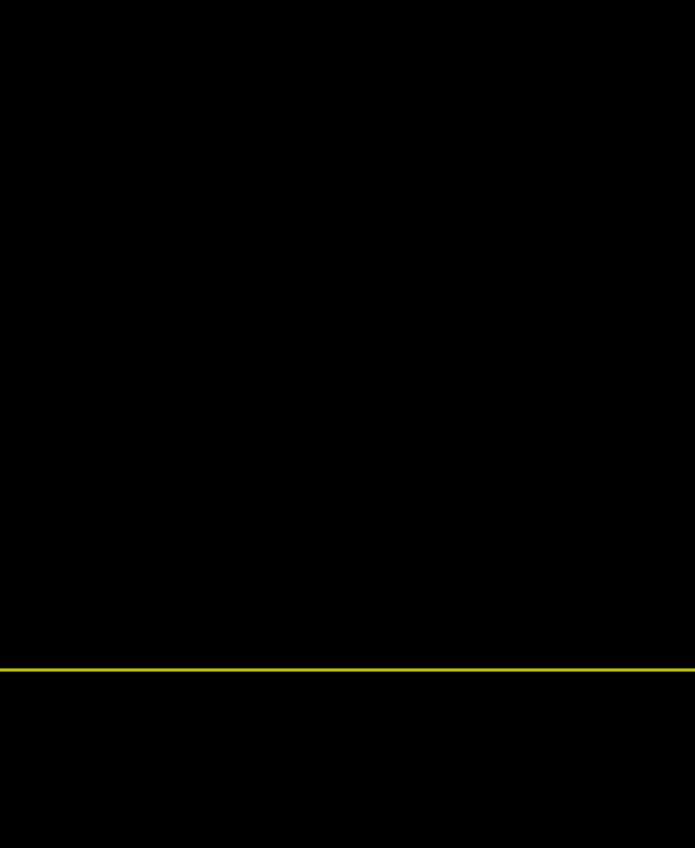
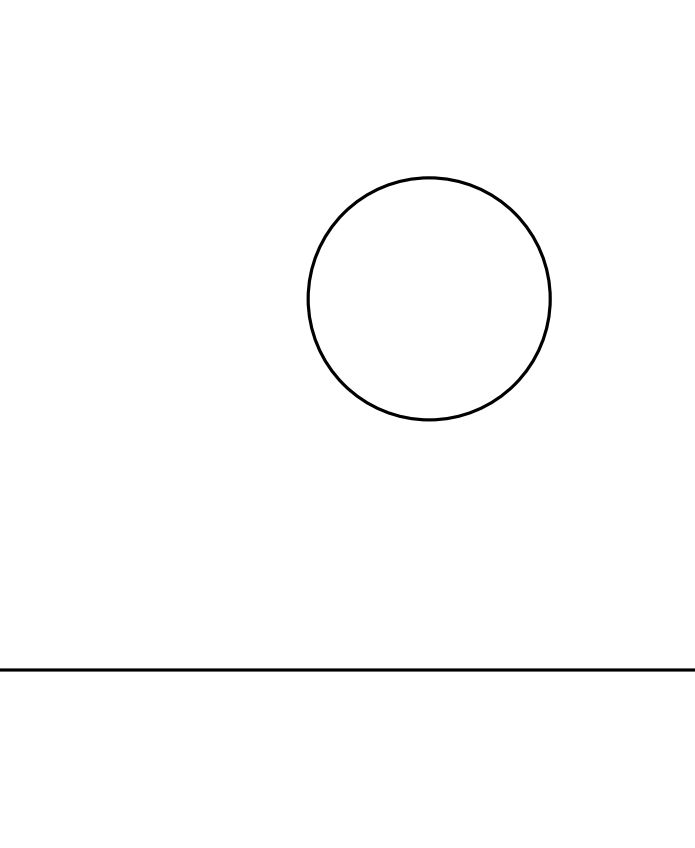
round board edge: none -> [306, 176, 552, 422]

